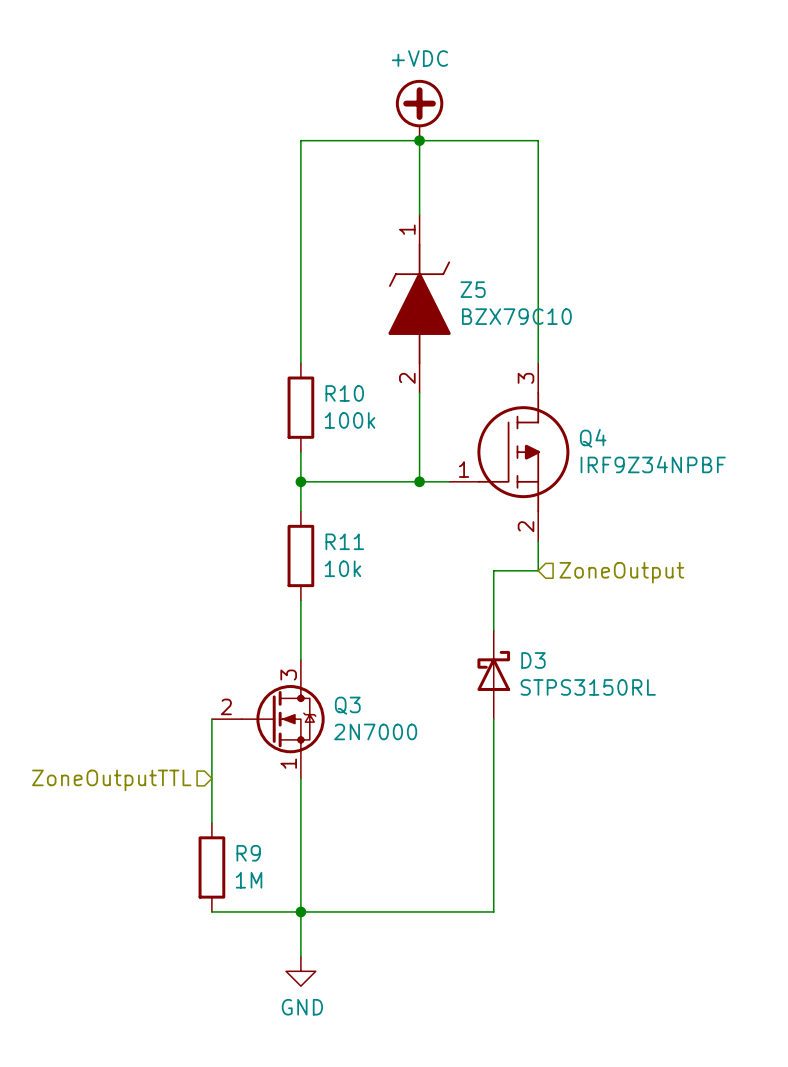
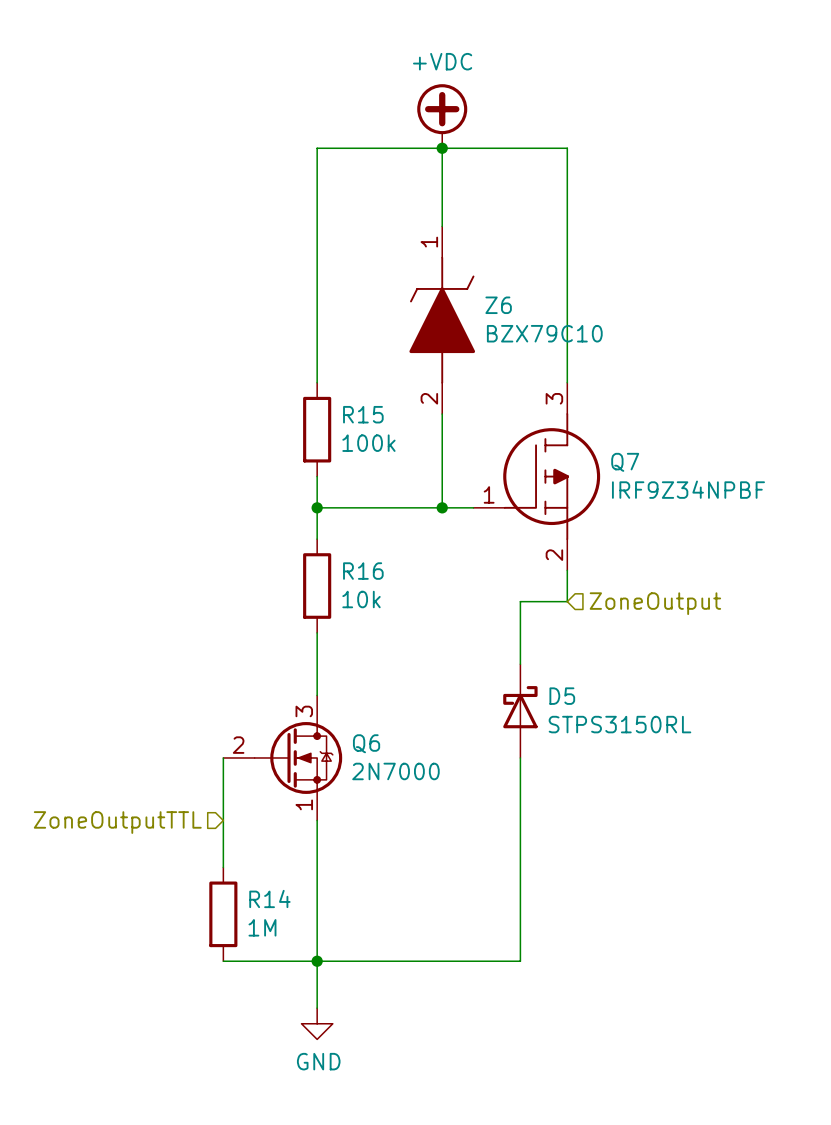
Z5 name: Z5 (473, 289) -> Z6 (498, 305)
R10 name: R10 (344, 393) -> R15 (363, 414)
Q4 name: Q4 (593, 438) -> Q7 (625, 462)
R11 name: R11 (344, 541) -> R16 (363, 571)
D3 name: D3 (533, 660) -> D5 (562, 696)
Q3 name: Q3 (347, 705) -> Q6 (366, 743)
R9 name: R9 (248, 853) -> R14 (269, 898)

